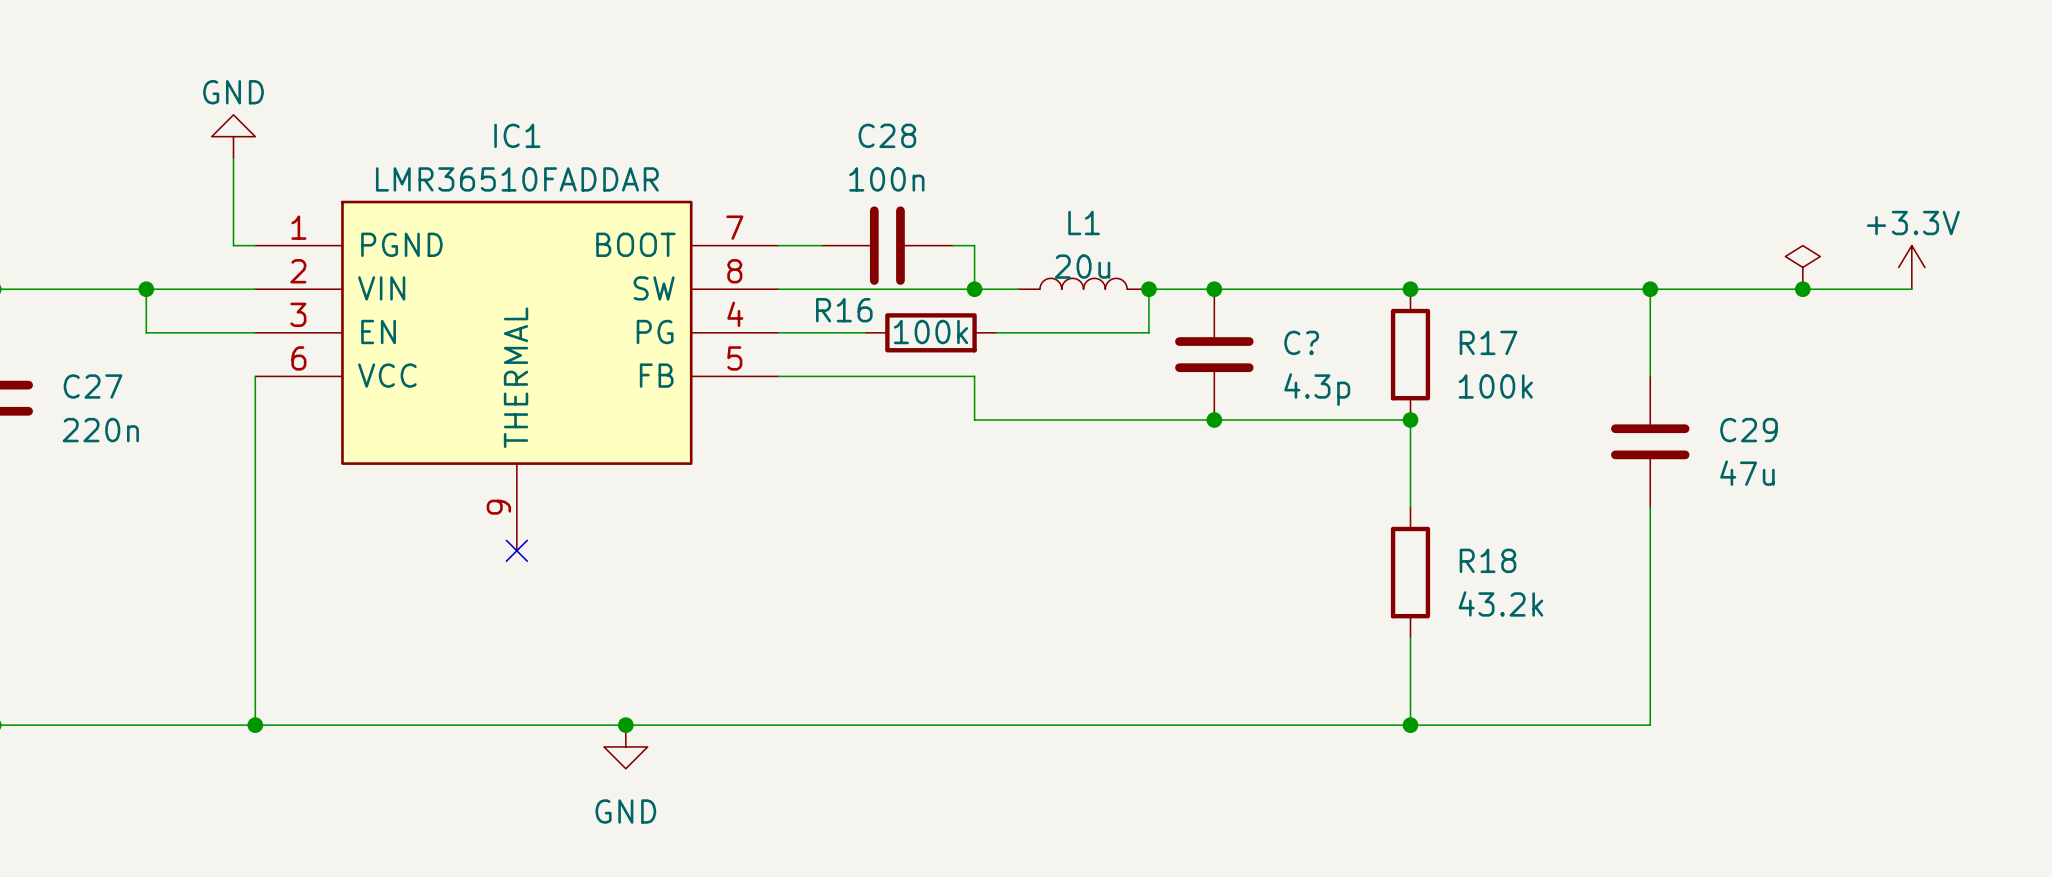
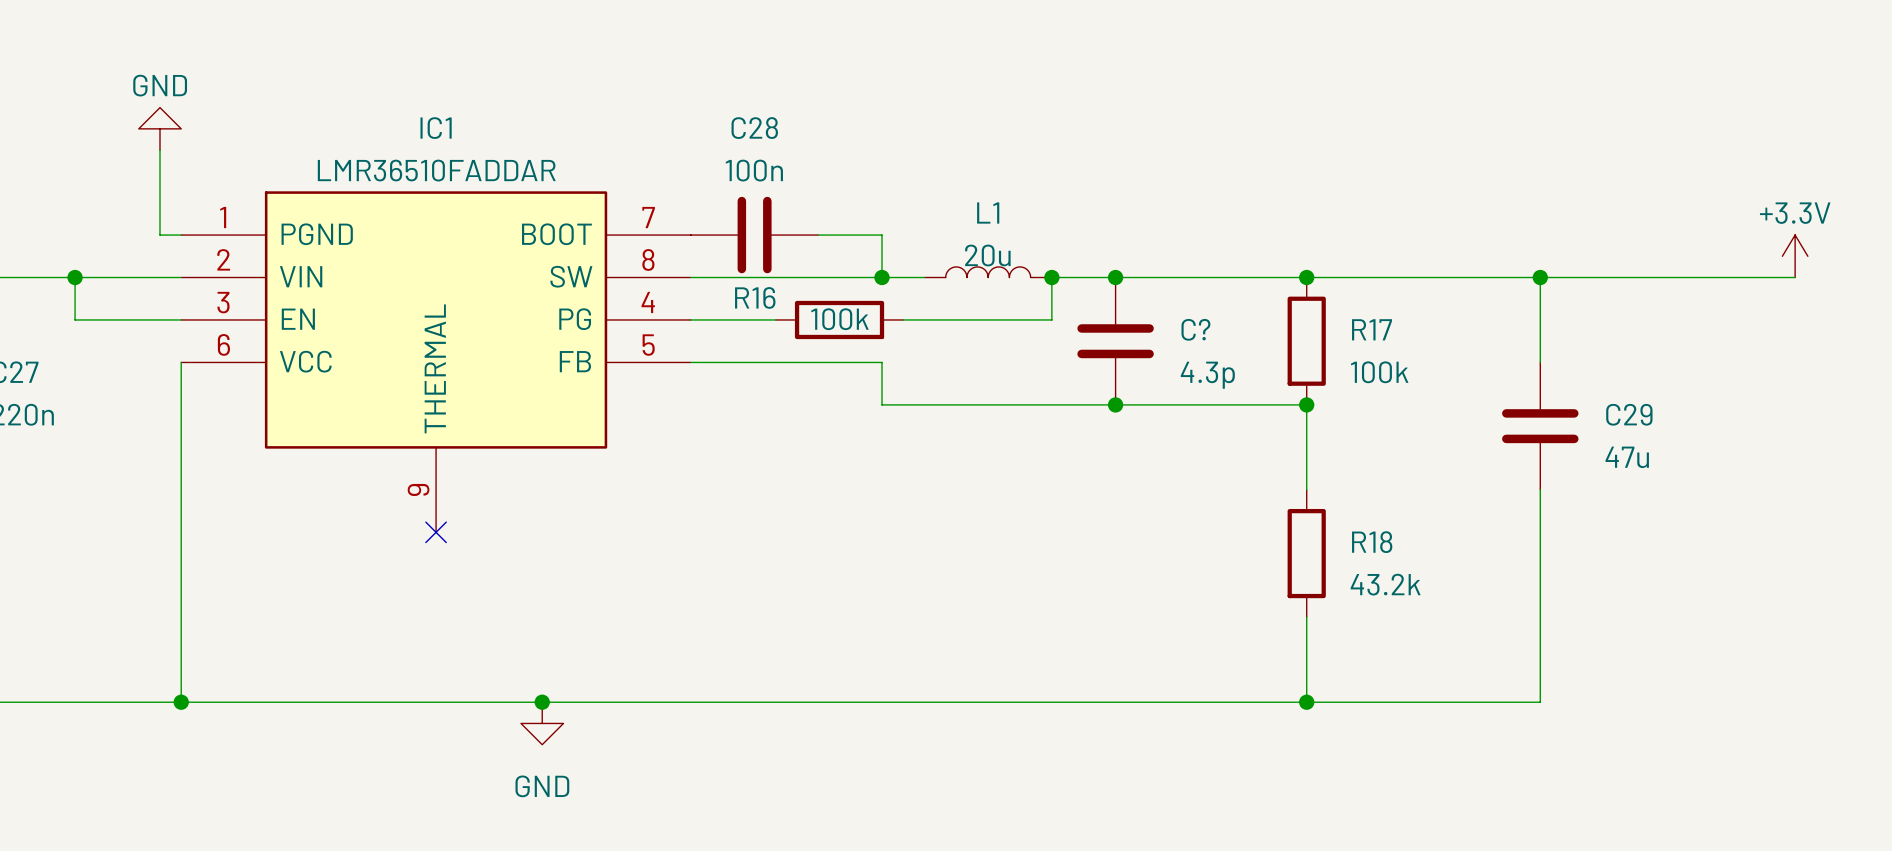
C28 position: (887, 245) -> (754, 235)
power symbol: (1802, 267) -> none
junction: (1802, 289) -> none

